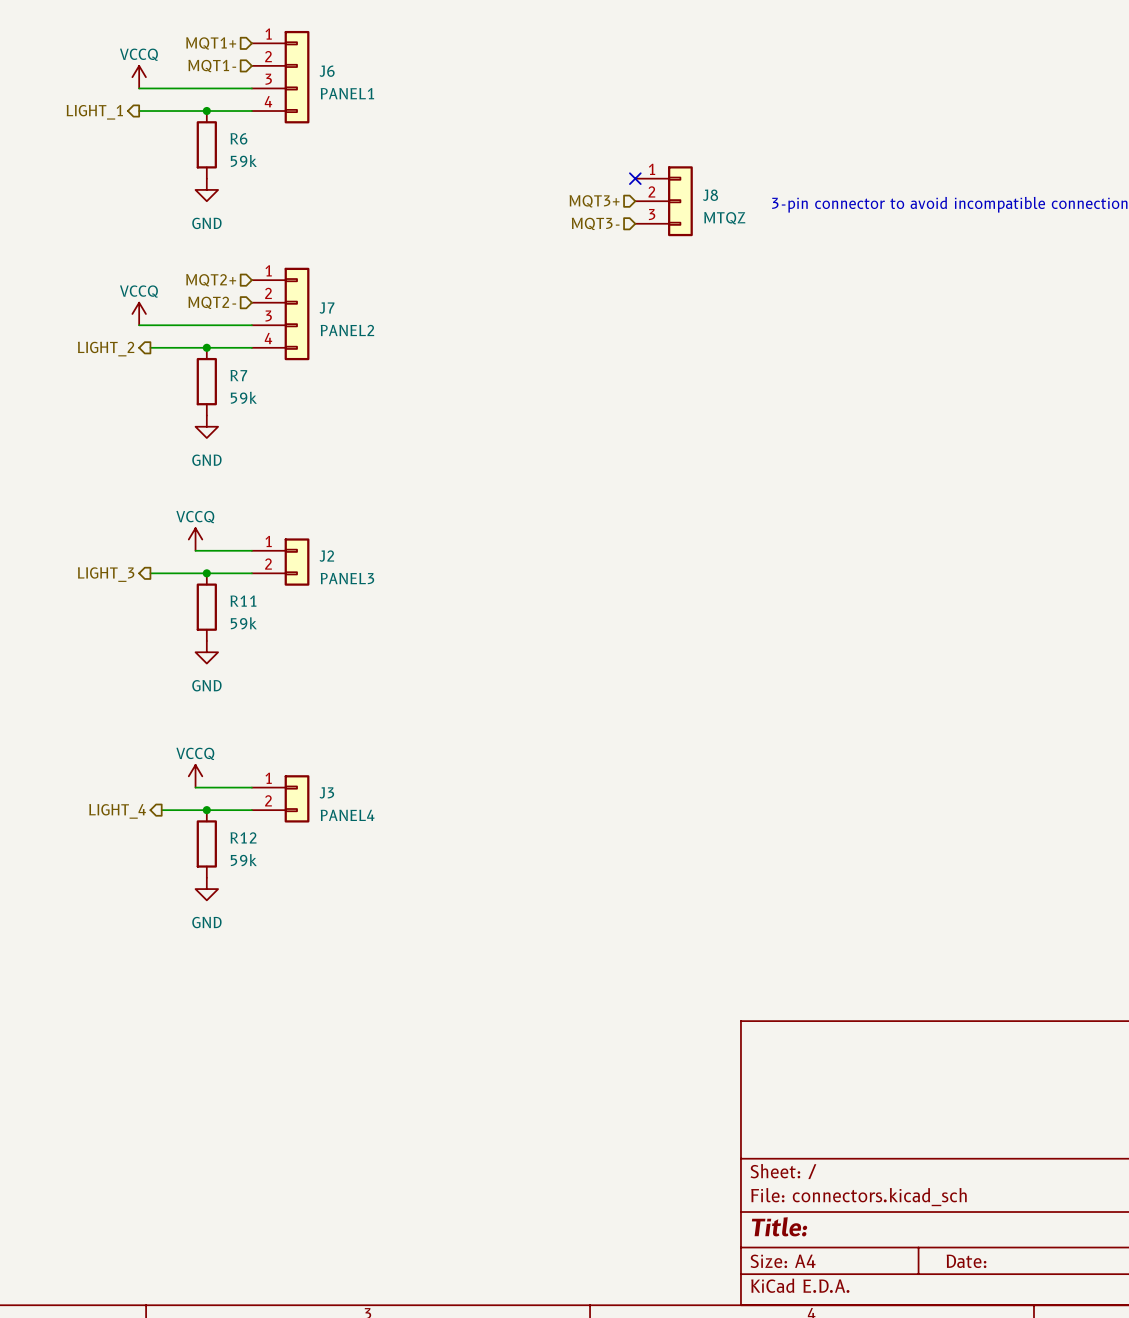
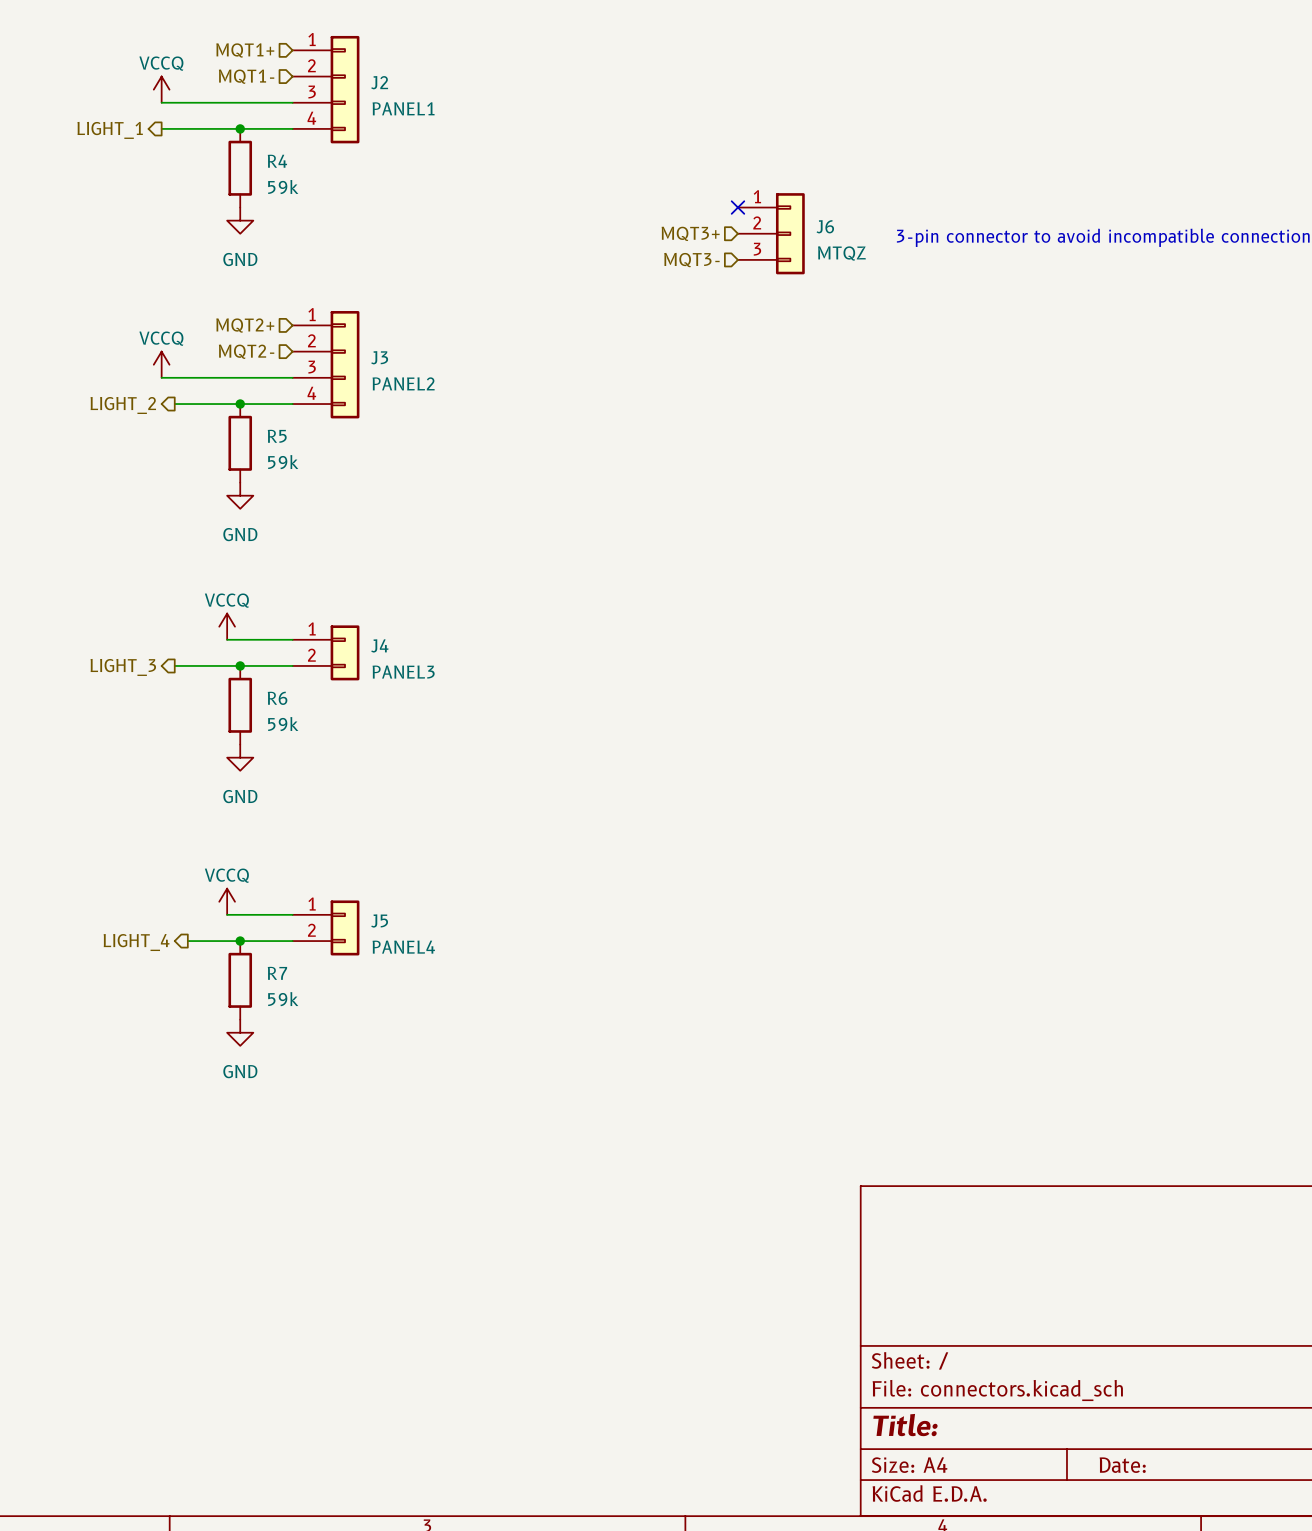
J6 name: J6 (327, 71) -> J2 (379, 82)
R6 name: R6 (238, 138) -> R4 (277, 161)
J8 name: J8 (710, 195) -> J6 (825, 226)
J7 name: J7 (327, 307) -> J3 (379, 357)
R7 name: R7 (238, 375) -> R5 (277, 436)
J2 name: J2 (326, 556) -> J4 (379, 645)
R11 name: R11 (243, 601) -> R6 (277, 698)
J3 name: J3 (326, 792) -> J5 (379, 920)
R12 name: R12 (243, 837) -> R7 (277, 973)

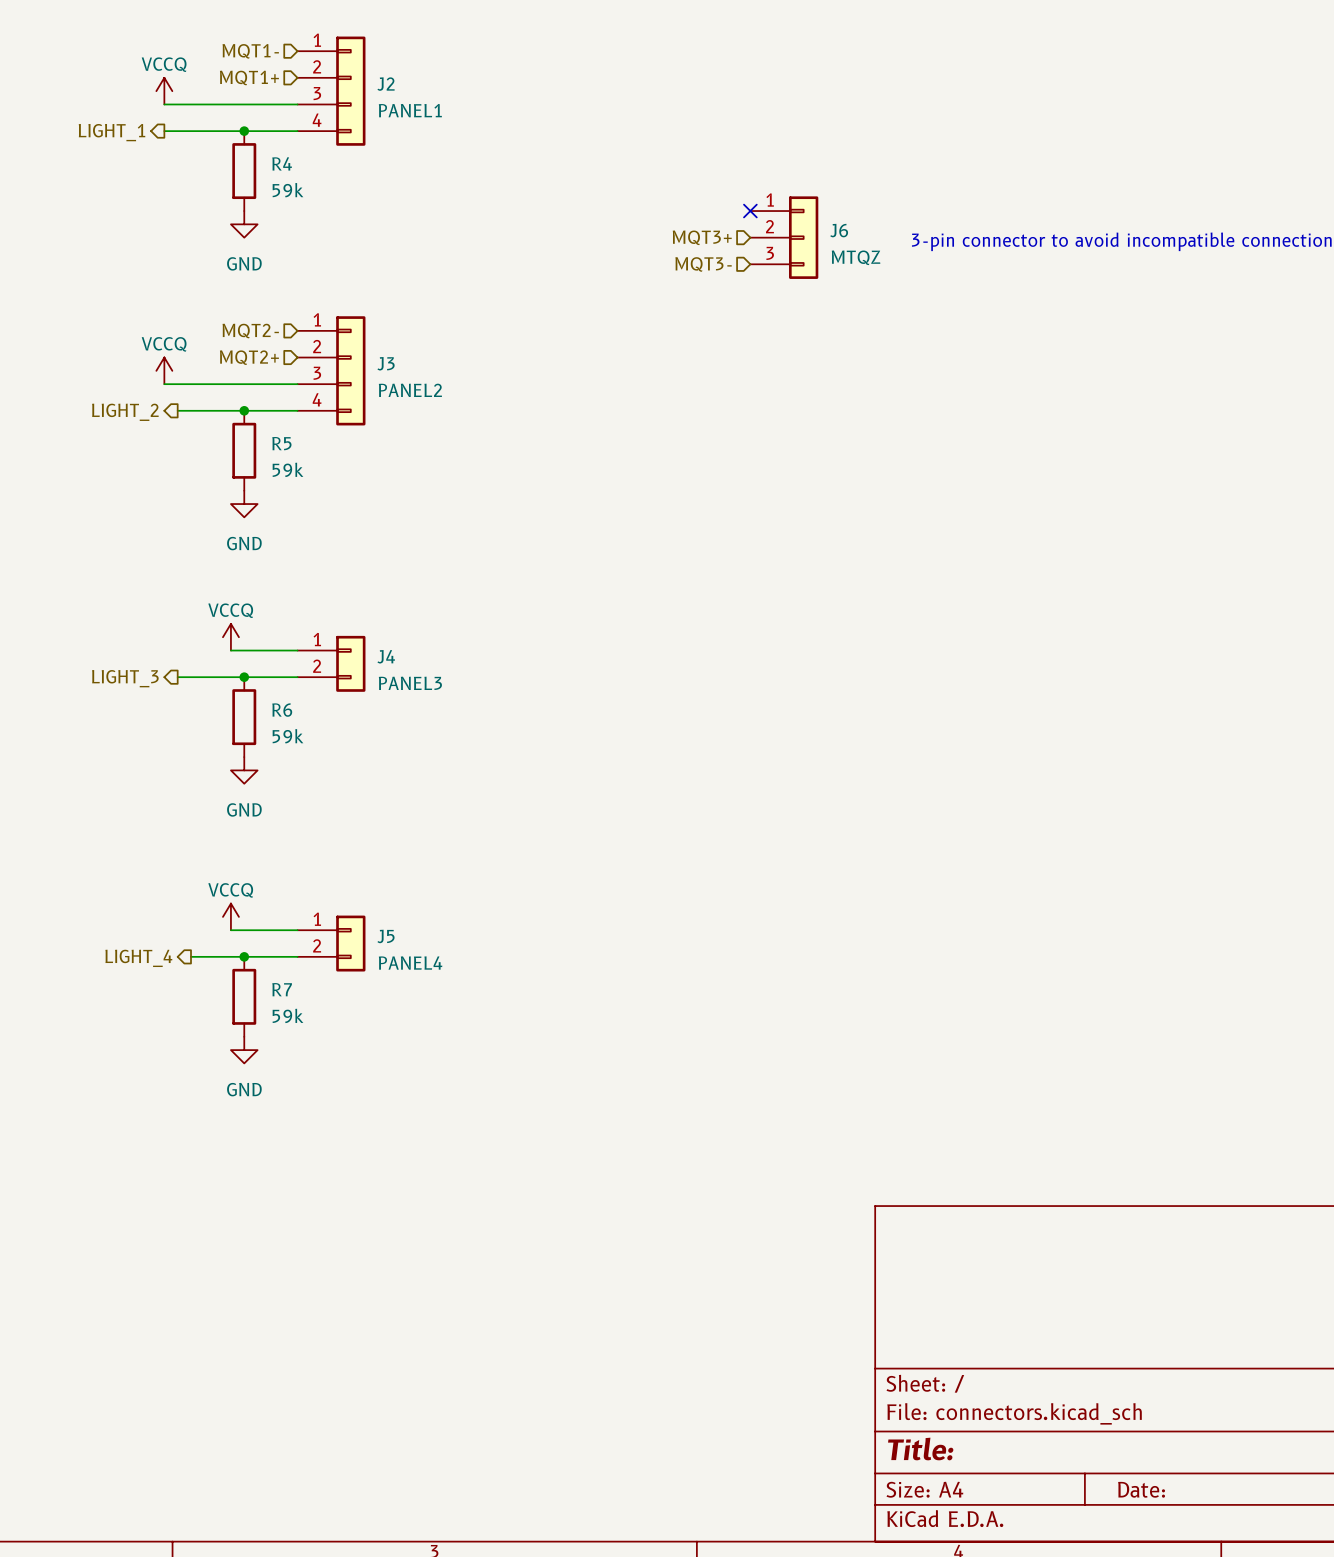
hierarchical label: MQT1+ (245, 50) -> MQT1- (250, 51)
hierarchical label: MQT1- (246, 76) -> MQT1+ (249, 77)
hierarchical label: MQT2+ (245, 325) -> MQT2- (250, 331)
hierarchical label: MQT2- (246, 351) -> MQT2+ (249, 357)

